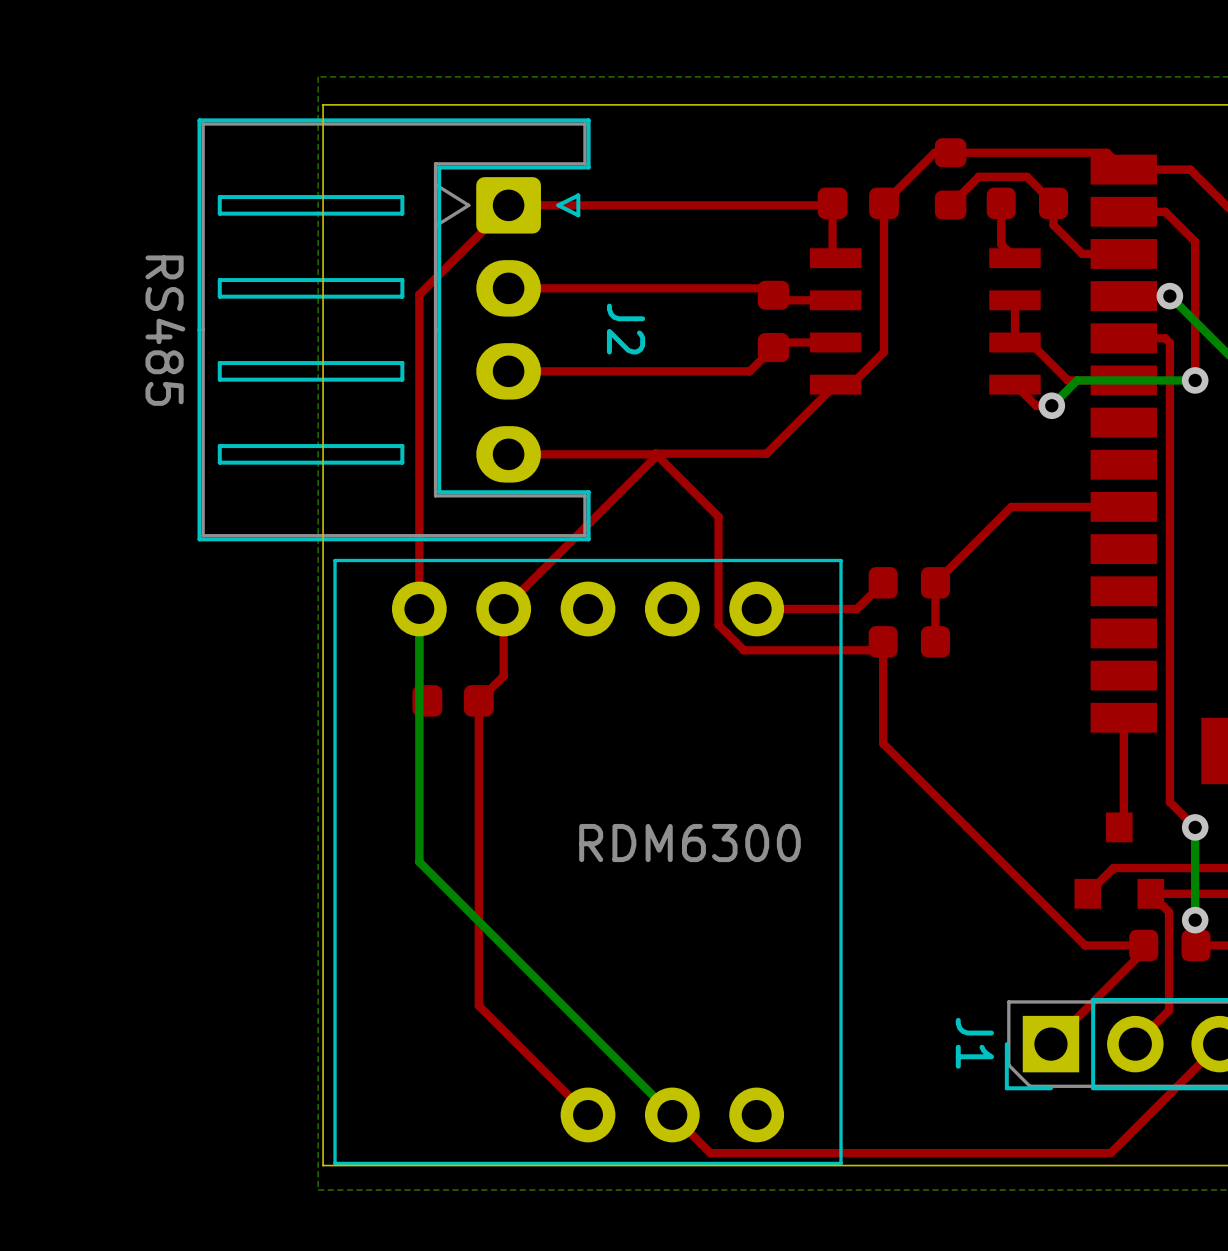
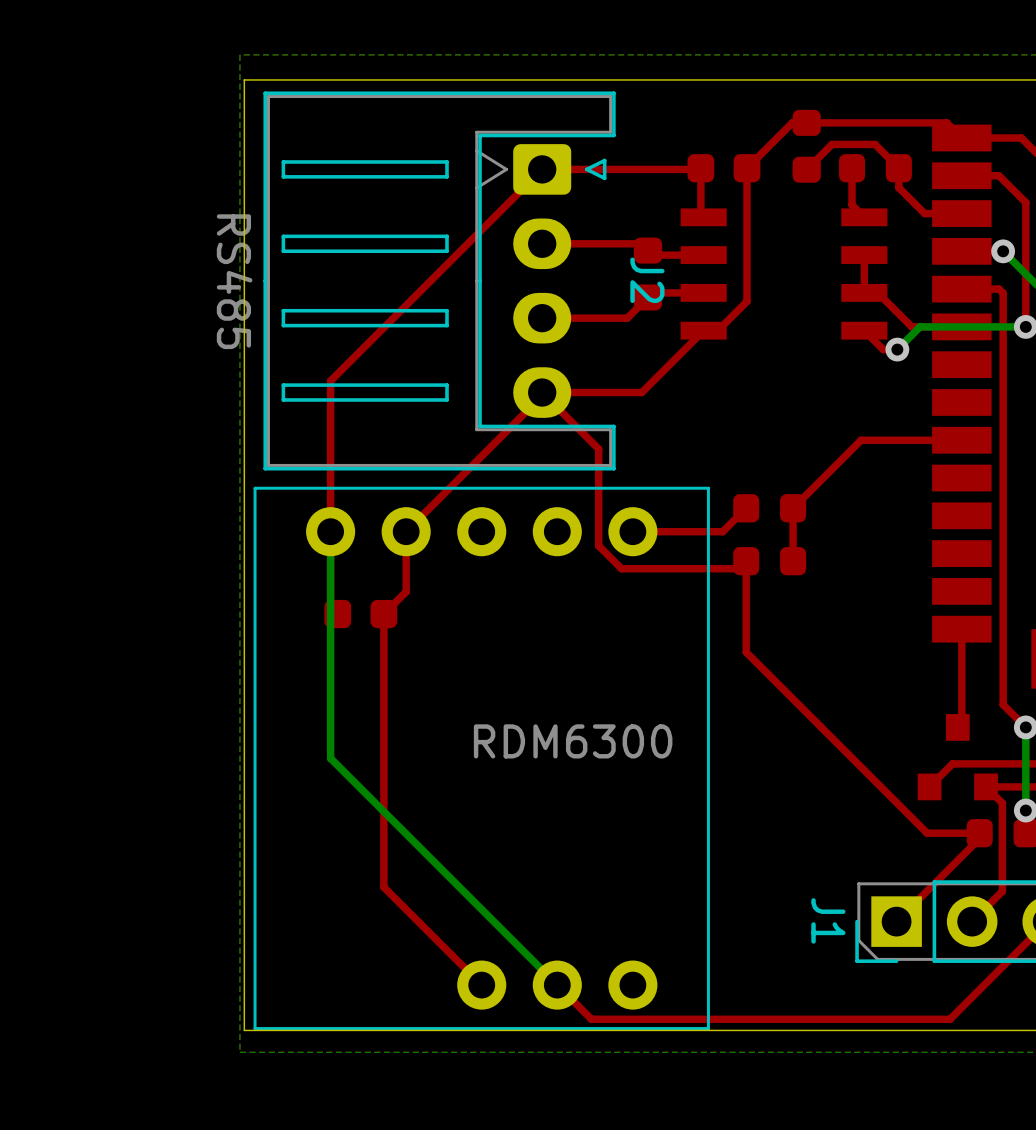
top track: (831, 204) (508, 205) (419, 294) (419, 440) -> (699, 169) (542, 169) (330, 380)
top track: (766, 288) (508, 288) -> (641, 243) (542, 243)
J2 position: (394, 329) -> (439, 280)
top track: (750, 370) (508, 371) -> (627, 318) (542, 318)
top track: (655, 453) (508, 454) -> none

